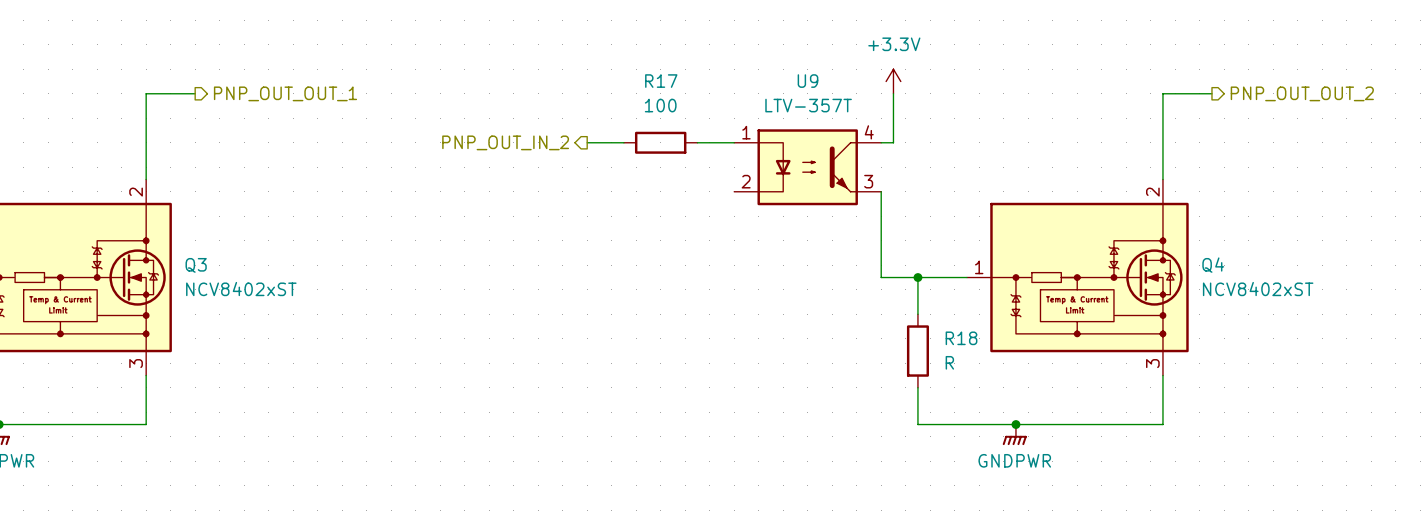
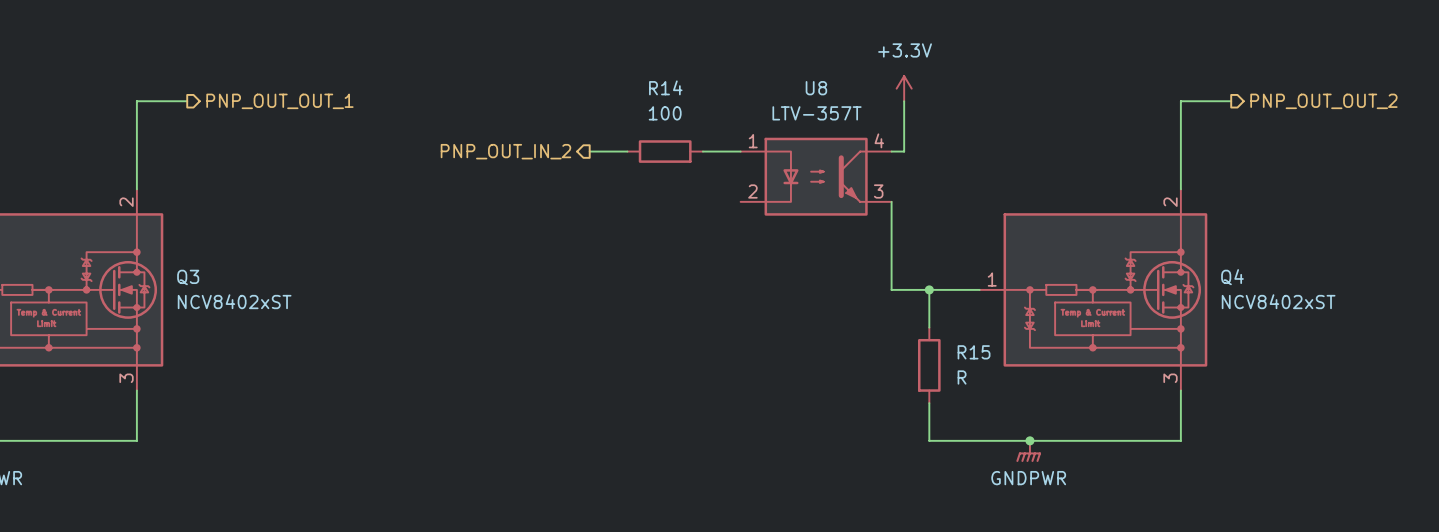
R17 name: R17 (661, 81) -> R14 (665, 87)
U9 name: U9 (808, 81) -> U8 (816, 88)
R18 name: R18 (961, 338) -> R15 (974, 352)

